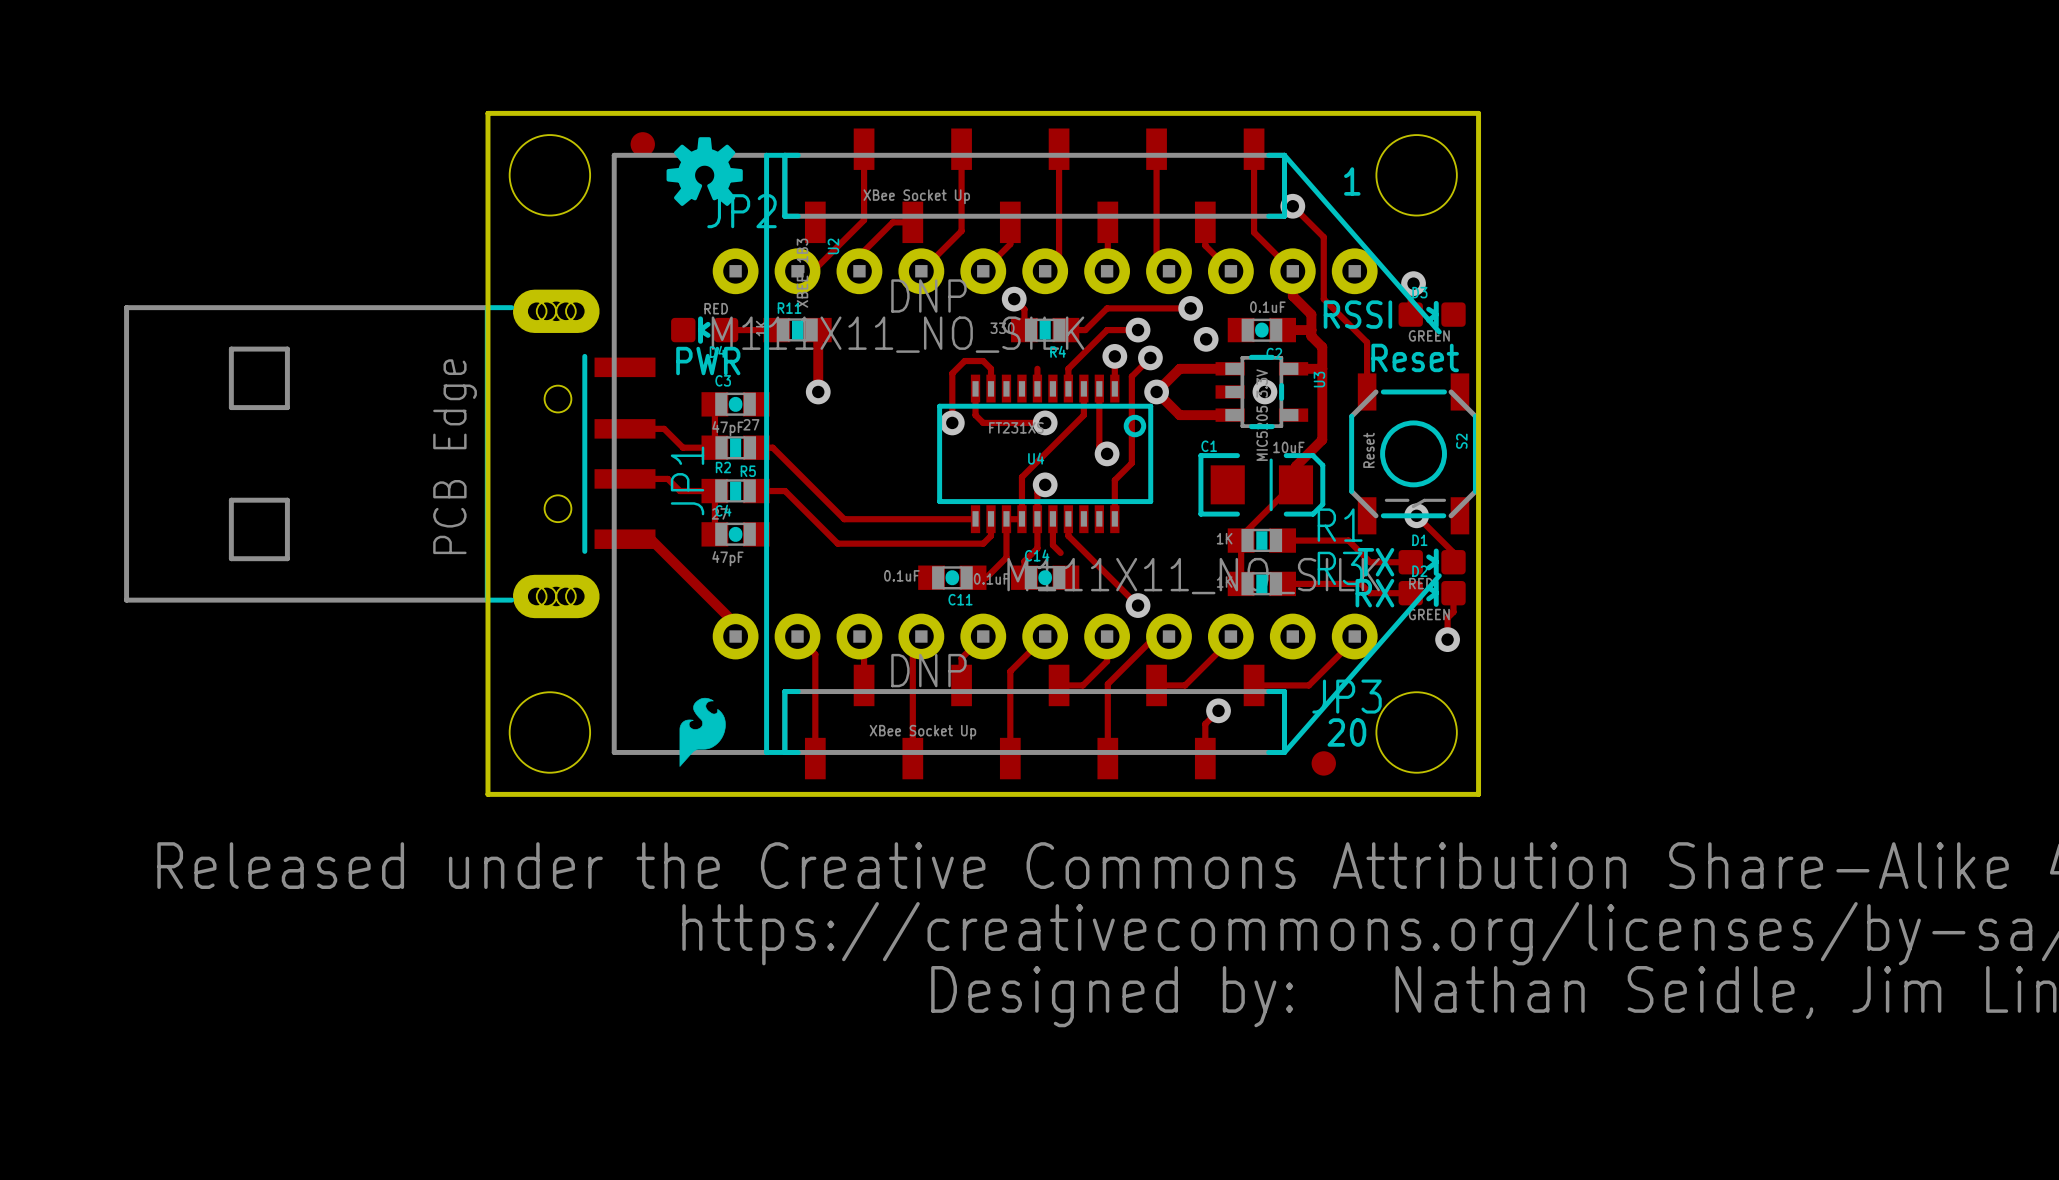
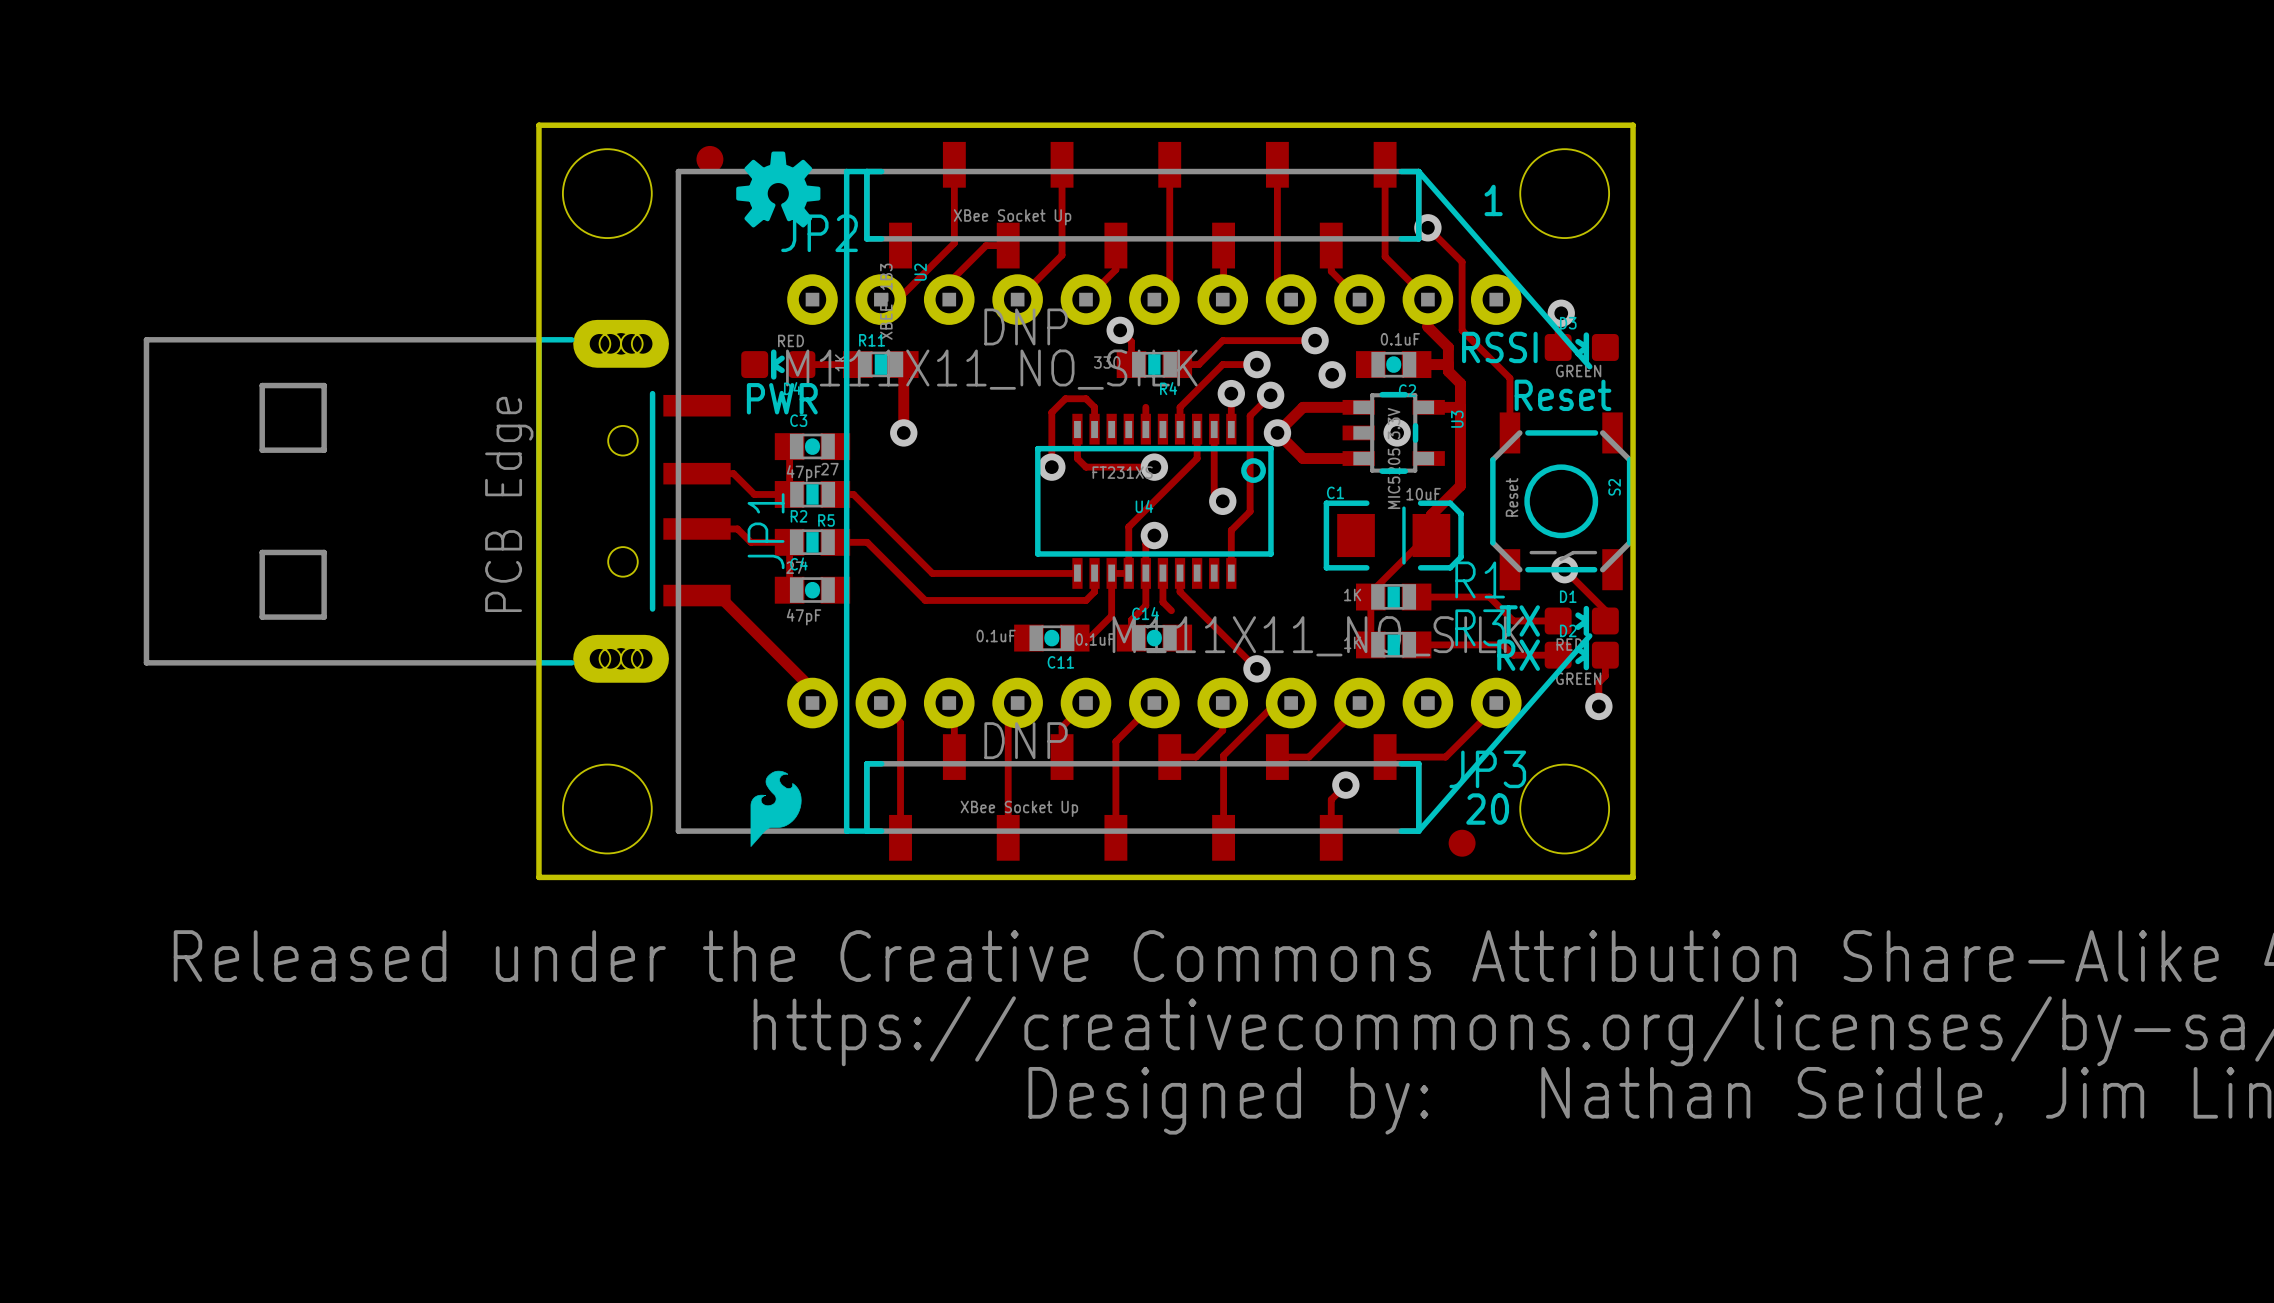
JP1 footprint: [124, 289, 656, 619] -> [143, 319, 731, 683]

